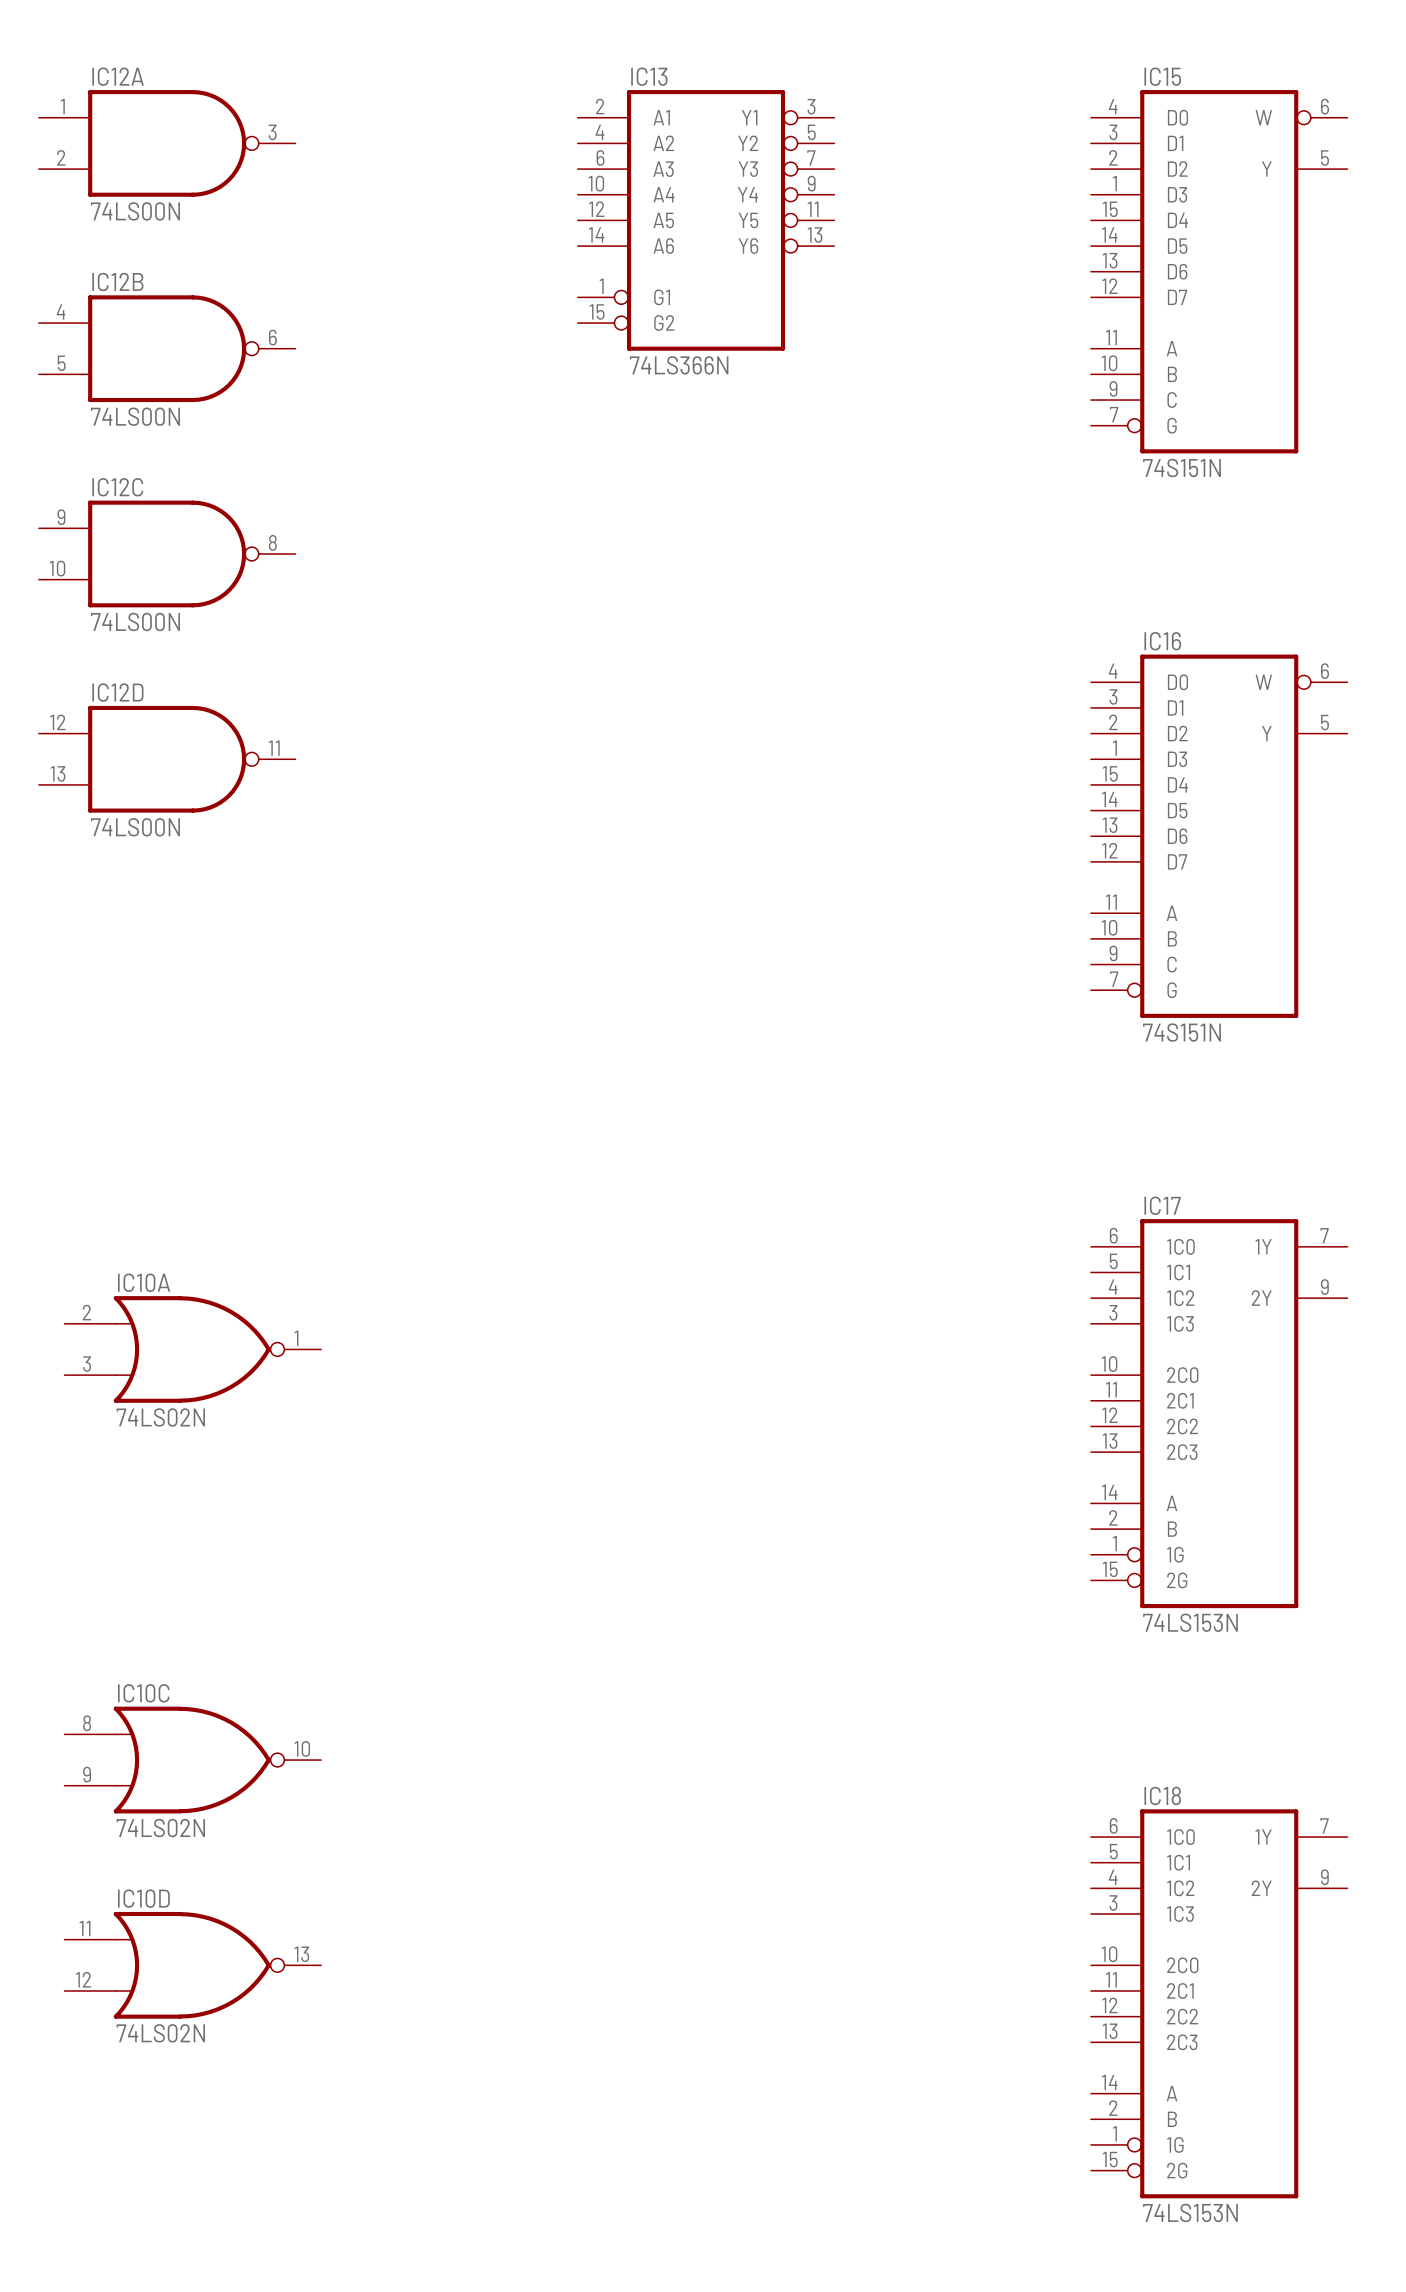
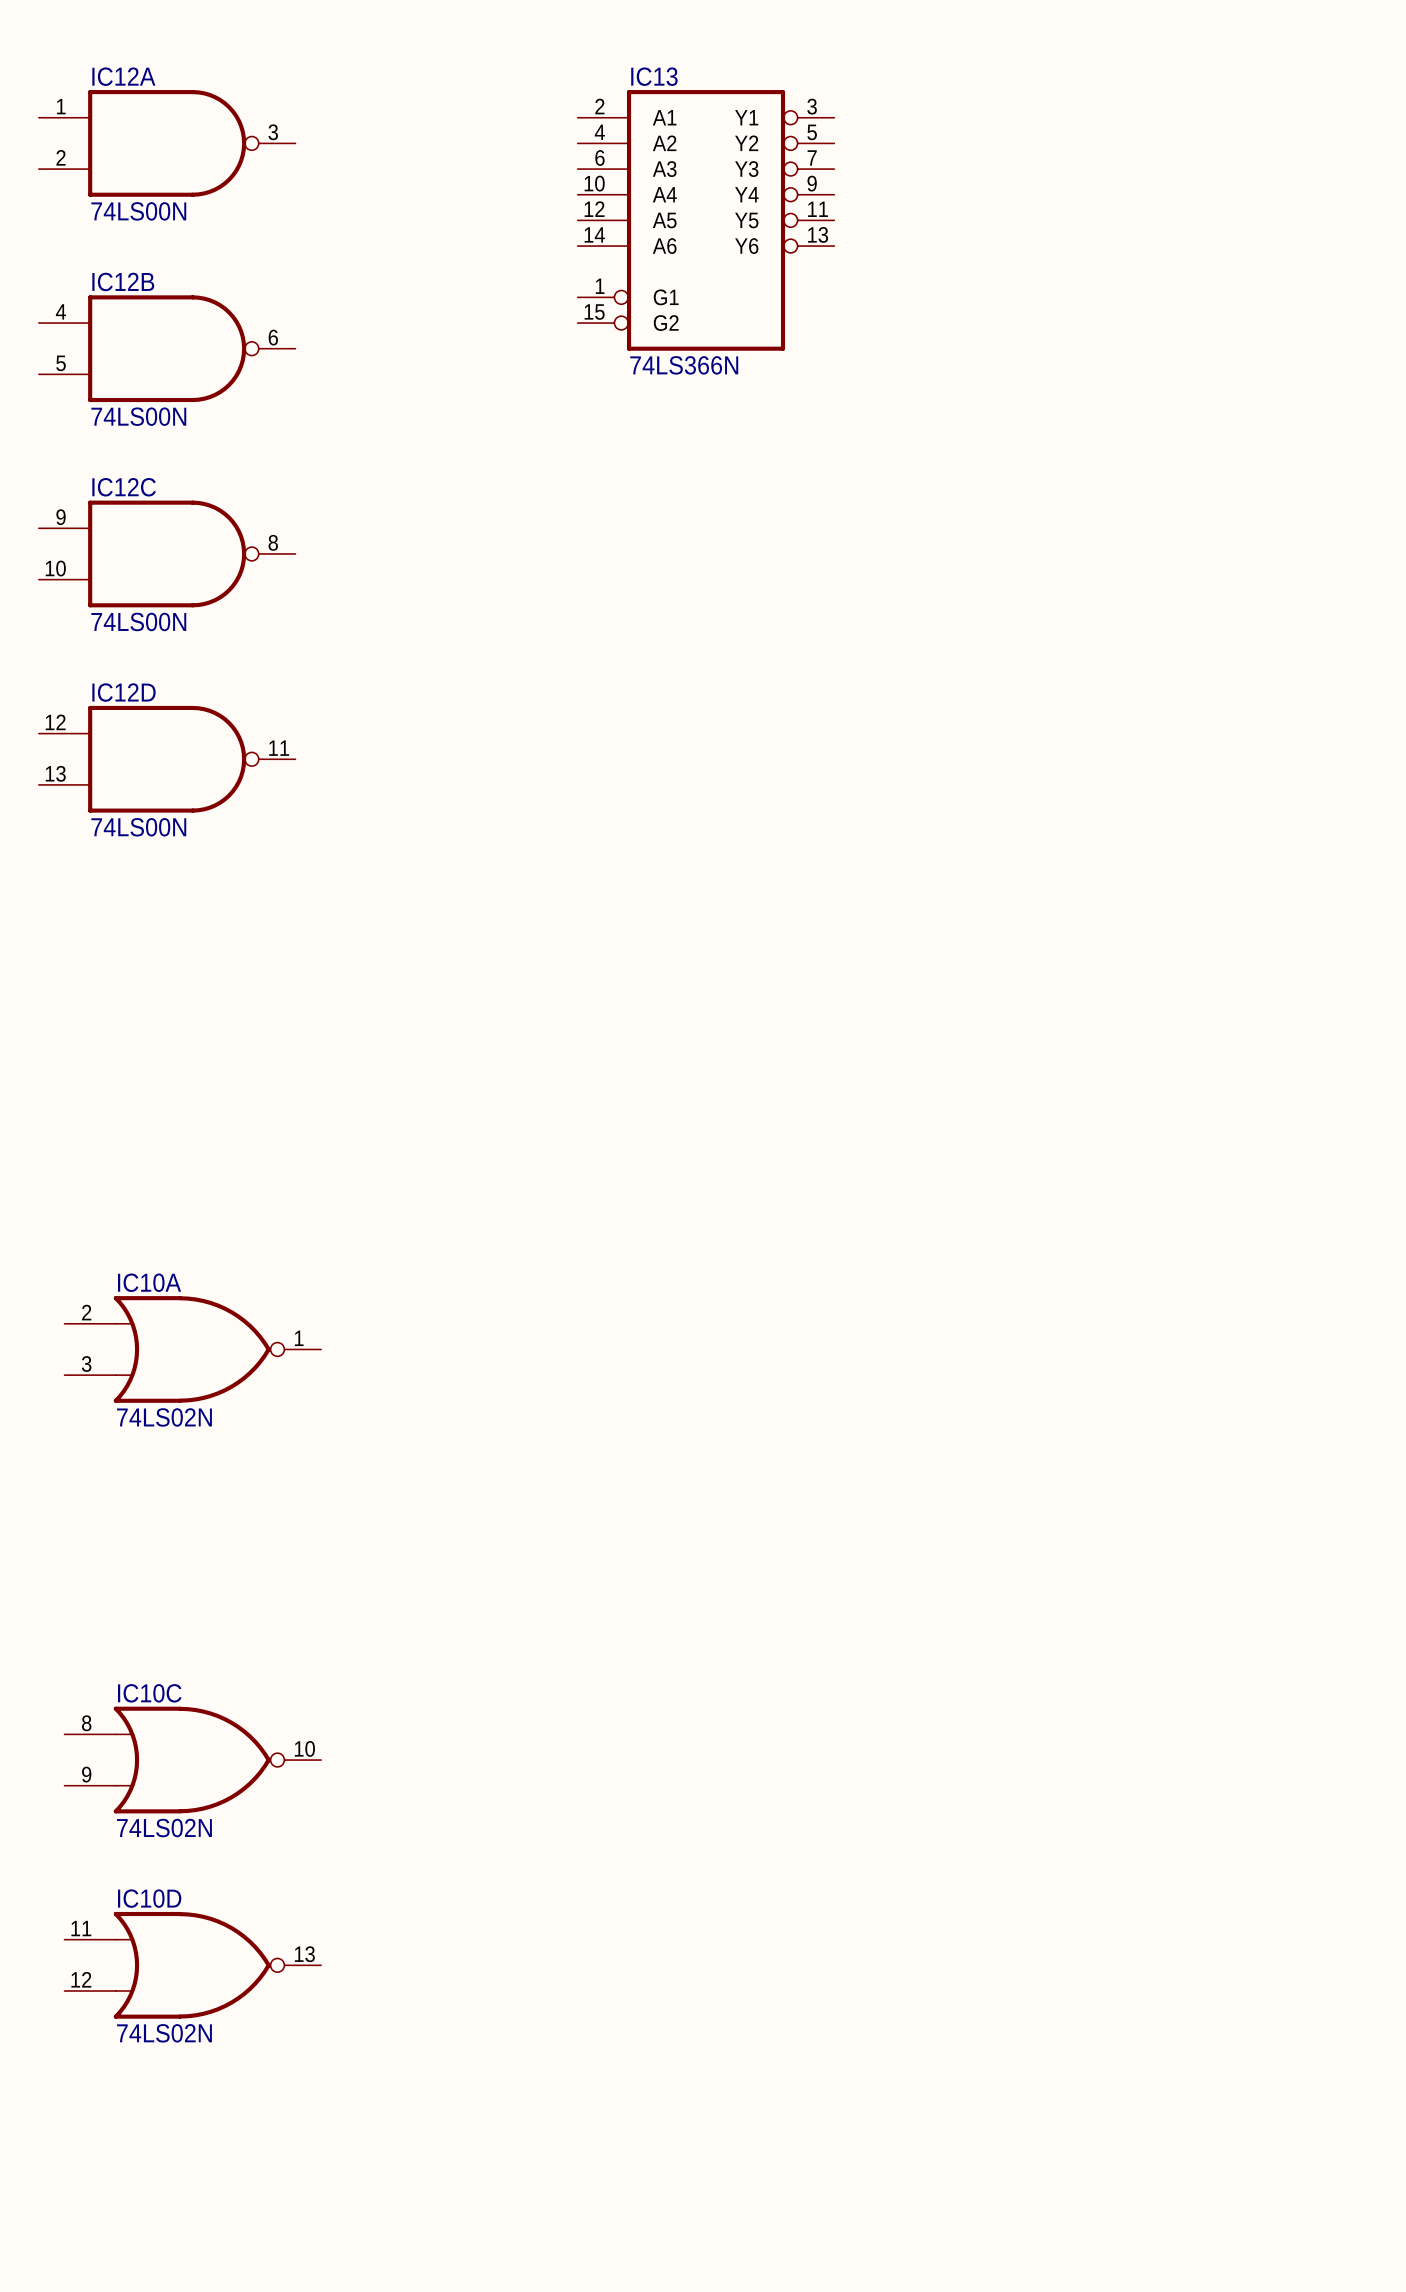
IC15: 74S151N (1219, 271) -> none
IC16: 74S151N (1219, 836) -> none
IC17: 74LS153N (1219, 1413) -> none
IC18: 74LS153N (1219, 2003) -> none

